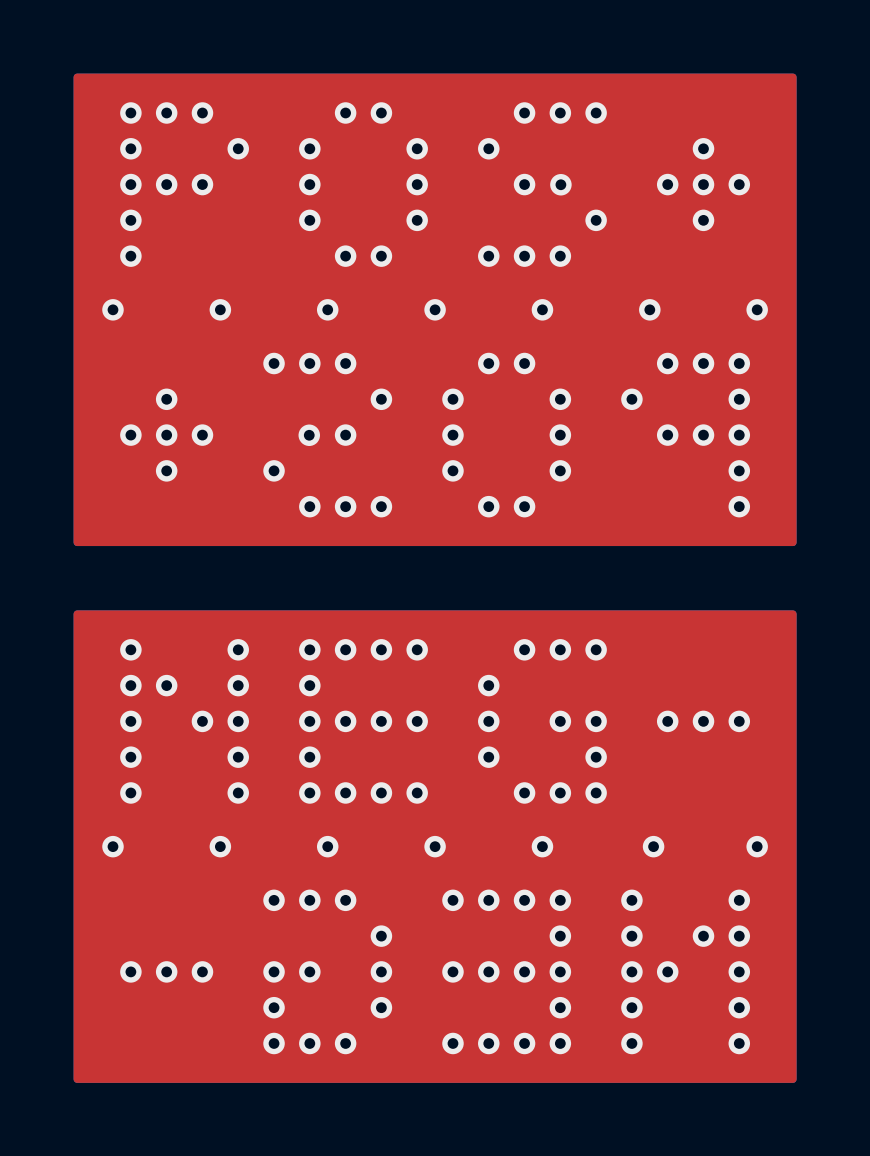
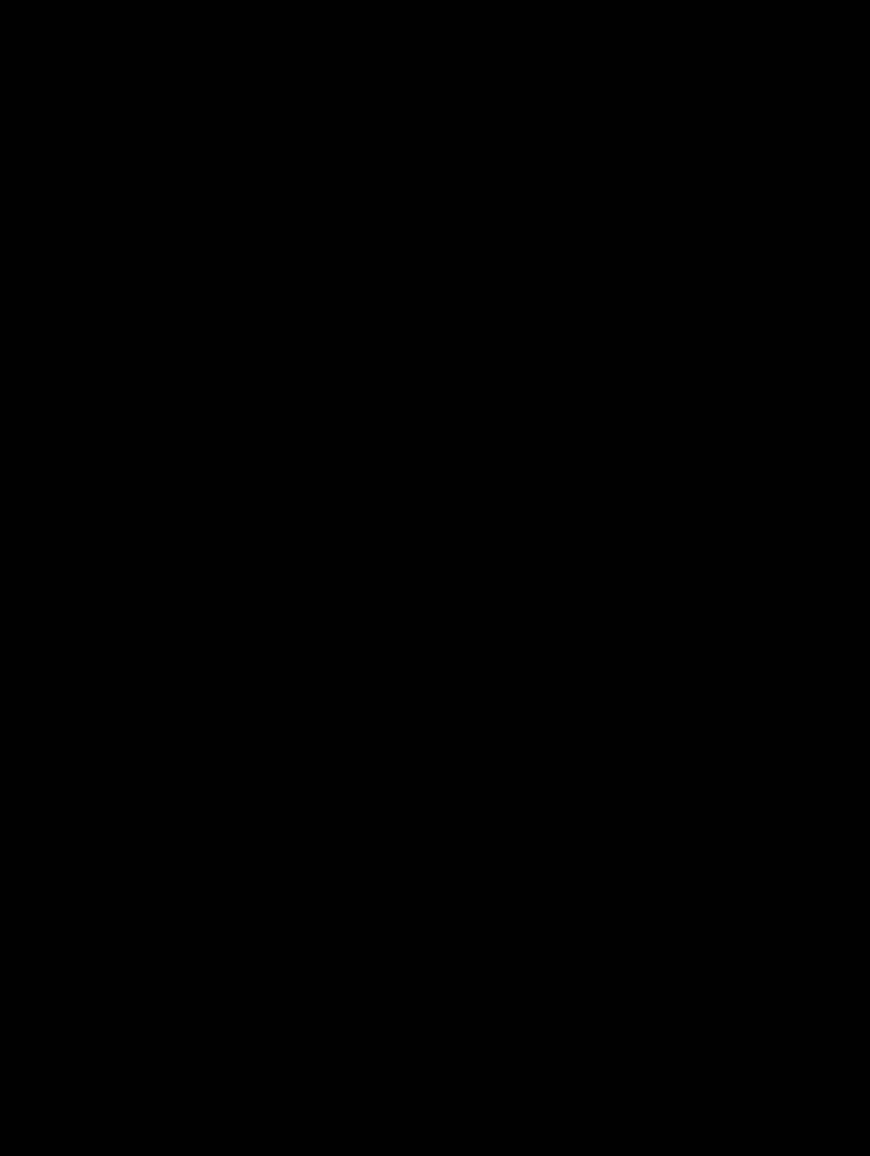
drawing: [73, 73, 797, 547] -> none
via: (130, 112) -> none
via: (166, 112) -> none
via: (202, 112) -> none
via: (345, 112) -> none
via: (381, 112) -> none
via: (524, 112) -> none
via: (560, 112) -> none
via: (596, 112) -> none
via: (130, 148) -> none
via: (238, 148) -> none
via: (309, 148) -> none
via: (417, 148) -> none
via: (488, 148) -> none
via: (703, 148) -> none
via: (130, 184) -> none
via: (166, 184) -> none
via: (202, 184) -> none
via: (309, 184) -> none
via: (417, 184) -> none
via: (524, 184) -> none
via: (560, 184) -> none
via: (667, 184) -> none
via: (703, 184) -> none
via: (739, 184) -> none
via: (130, 220) -> none
via: (309, 220) -> none
via: (417, 220) -> none
via: (596, 220) -> none
via: (703, 220) -> none
via: (130, 256) -> none
via: (345, 256) -> none
via: (381, 256) -> none
via: (488, 256) -> none
via: (524, 256) -> none
via: (560, 256) -> none
via: (112, 309) -> none
via: (220, 309) -> none
via: (327, 309) -> none
via: (435, 309) -> none
via: (542, 309) -> none
via: (649, 309) -> none
via: (757, 309) -> none
via: (274, 363) -> none
via: (309, 363) -> none
via: (345, 363) -> none
via: (488, 363) -> none
via: (524, 363) -> none
via: (667, 363) -> none
via: (703, 363) -> none
via: (739, 363) -> none
via: (166, 399) -> none
via: (381, 399) -> none
via: (452, 399) -> none
via: (560, 399) -> none
via: (631, 399) -> none
via: (739, 399) -> none
via: (130, 435) -> none
via: (166, 435) -> none
via: (202, 435) -> none
via: (309, 435) -> none
via: (345, 435) -> none
via: (452, 435) -> none
via: (560, 435) -> none
via: (667, 435) -> none
via: (703, 435) -> none
via: (739, 435) -> none
via: (166, 470) -> none
via: (274, 470) -> none
via: (452, 470) -> none
via: (560, 470) -> none
via: (739, 470) -> none
via: (309, 506) -> none
via: (345, 506) -> none
via: (381, 506) -> none
via: (488, 506) -> none
via: (524, 506) -> none
via: (739, 506) -> none
drawing: [73, 610, 797, 1083] -> none
via: (130, 649) -> none
via: (238, 649) -> none
via: (309, 649) -> none
via: (345, 649) -> none
via: (381, 649) -> none
via: (417, 649) -> none
via: (524, 649) -> none
via: (560, 649) -> none
via: (596, 649) -> none
via: (130, 685) -> none
via: (166, 685) -> none
via: (238, 685) -> none
via: (309, 685) -> none
via: (488, 685) -> none
via: (130, 721) -> none
via: (202, 721) -> none
via: (238, 721) -> none
via: (309, 721) -> none
via: (345, 721) -> none
via: (381, 721) -> none
via: (417, 721) -> none
via: (488, 721) -> none
via: (560, 721) -> none
via: (596, 721) -> none
via: (667, 721) -> none
via: (703, 721) -> none
via: (739, 721) -> none
via: (130, 757) -> none
via: (238, 757) -> none
via: (309, 757) -> none
via: (488, 757) -> none
via: (596, 757) -> none
via: (130, 792) -> none
via: (238, 792) -> none
via: (309, 792) -> none
via: (345, 792) -> none
via: (381, 792) -> none
via: (417, 792) -> none
via: (524, 792) -> none
via: (560, 792) -> none
via: (596, 792) -> none
via: (112, 846) -> none
via: (220, 846) -> none
via: (327, 846) -> none
via: (435, 846) -> none
via: (542, 846) -> none
via: (653, 846) -> none
via: (757, 846) -> none
via: (274, 900) -> none
via: (309, 900) -> none
via: (345, 900) -> none
via: (452, 900) -> none
via: (488, 900) -> none
via: (524, 900) -> none
via: (560, 900) -> none
via: (631, 900) -> none
via: (739, 900) -> none
via: (381, 936) -> none
via: (560, 936) -> none
via: (631, 936) -> none
via: (703, 936) -> none
via: (739, 936) -> none
via: (130, 971) -> none
via: (166, 971) -> none
via: (202, 971) -> none
via: (274, 971) -> none
via: (309, 971) -> none
via: (381, 971) -> none
via: (452, 971) -> none
via: (488, 971) -> none
via: (524, 971) -> none
via: (560, 971) -> none
via: (631, 971) -> none
via: (667, 971) -> none
via: (739, 971) -> none
via: (274, 1007) -> none
via: (381, 1007) -> none
via: (560, 1007) -> none
via: (631, 1007) -> none
via: (739, 1007) -> none
via: (274, 1043) -> none
via: (309, 1043) -> none
via: (345, 1043) -> none
via: (452, 1043) -> none
via: (488, 1043) -> none
via: (524, 1043) -> none
via: (560, 1043) -> none
via: (631, 1043) -> none
via: (739, 1043) -> none

